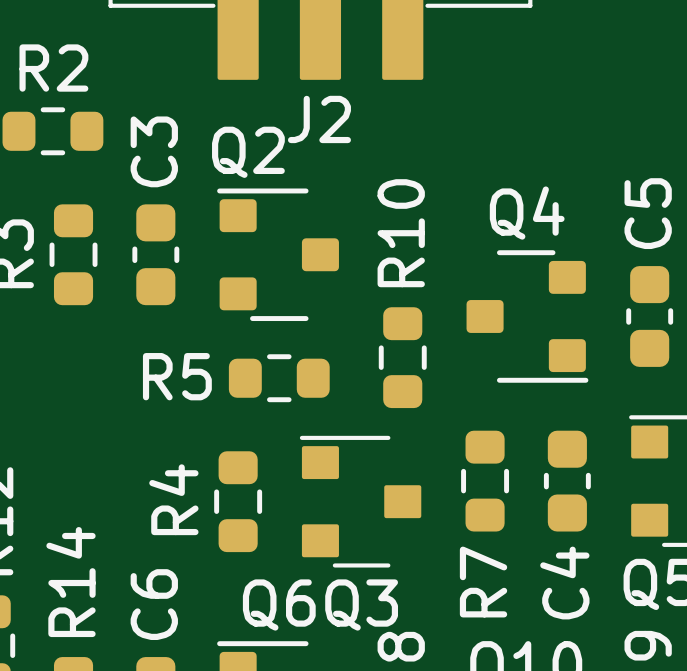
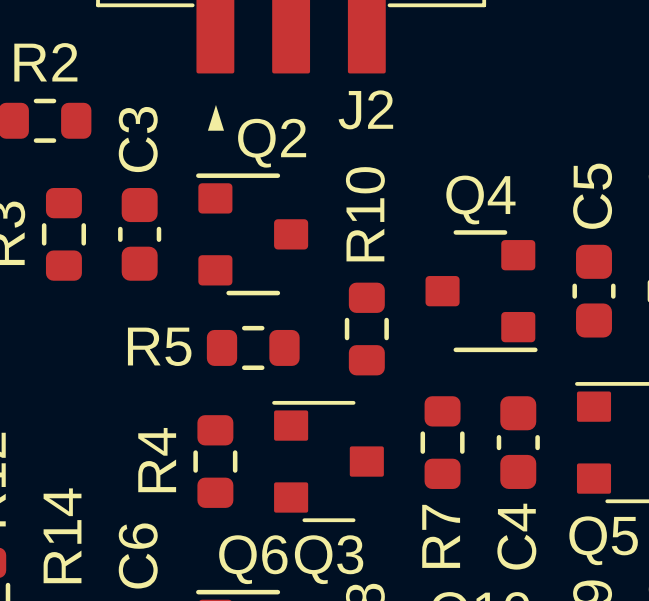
drawing: none -> [207, 104, 225, 131]
J2 name position: J2 (319, 119) -> J2 (365, 109)
Q2 name position: Q2 (248, 152) -> Q2 (272, 143)

